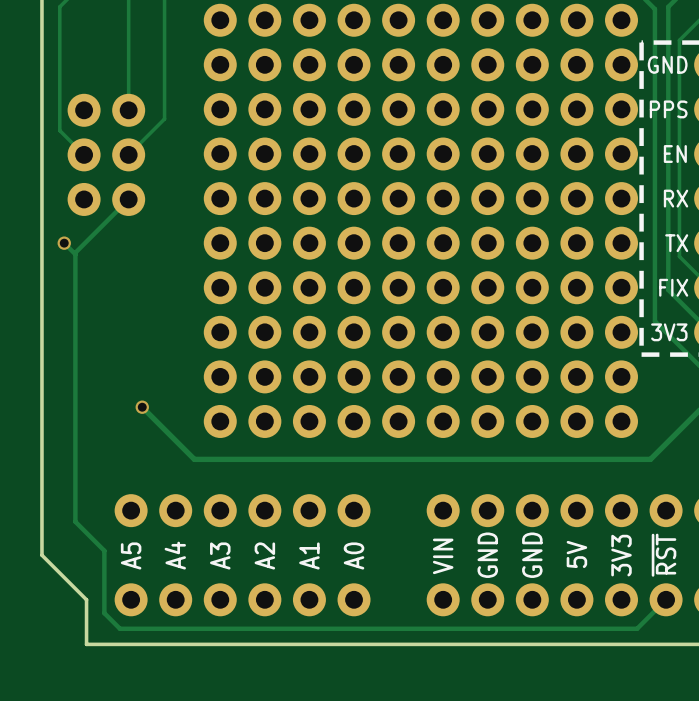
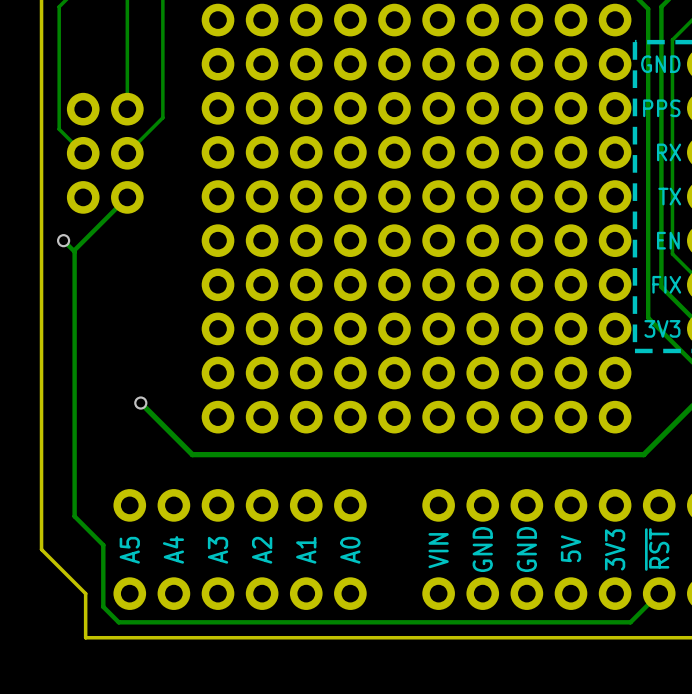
text: EN (675, 154) -> RX (669, 152)
text: RX (676, 198) -> TX (669, 196)
text: TX (676, 243) -> EN (668, 240)

